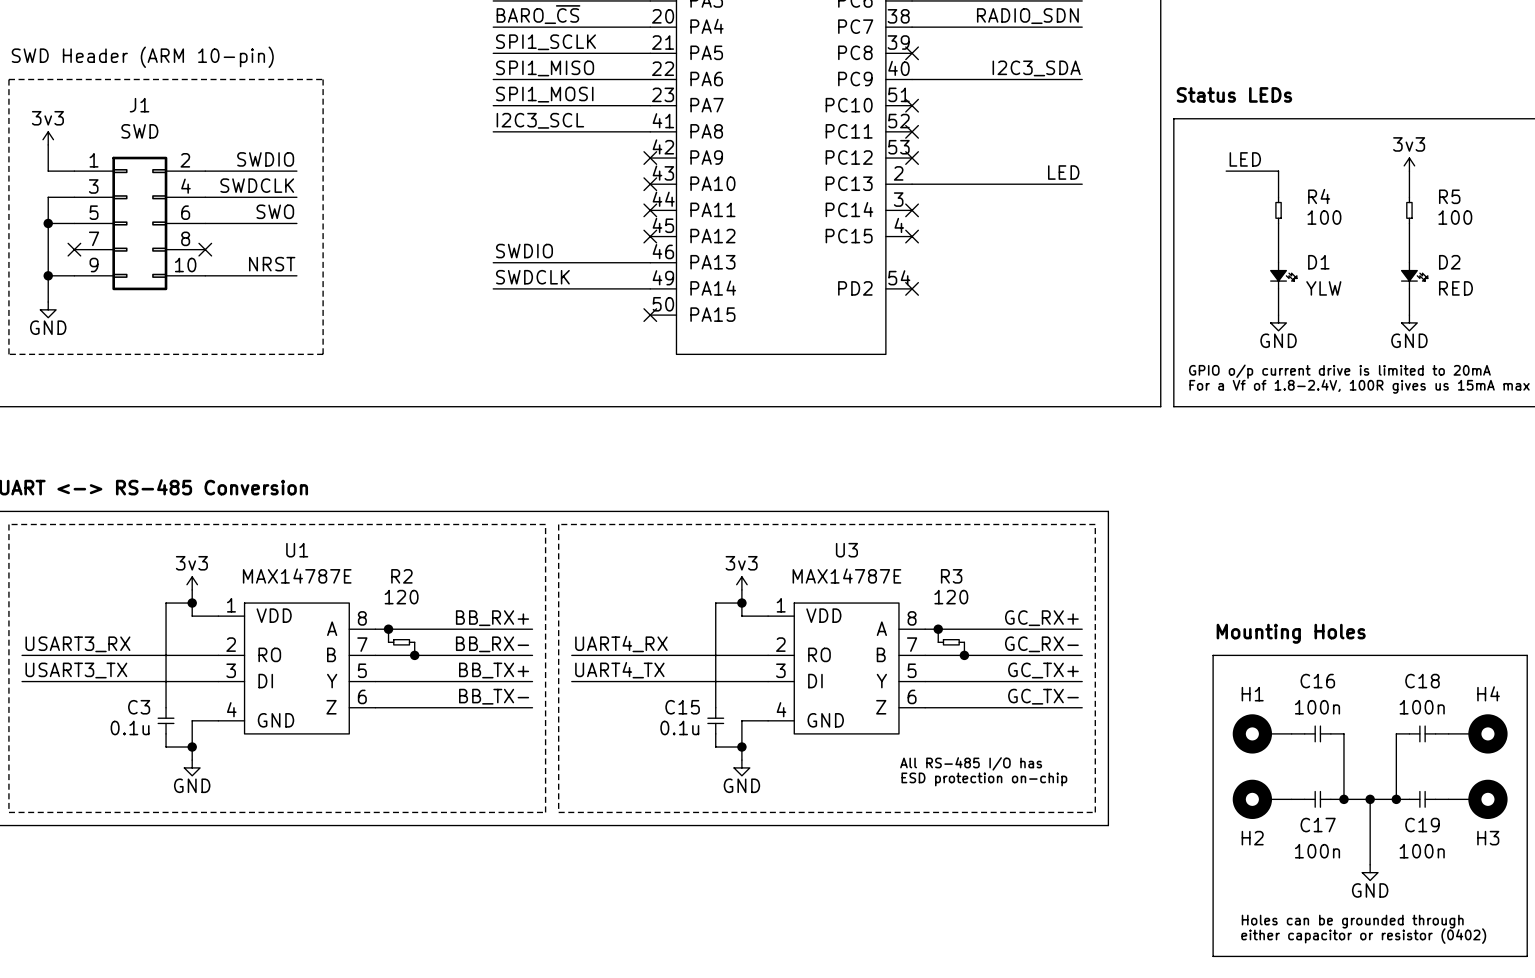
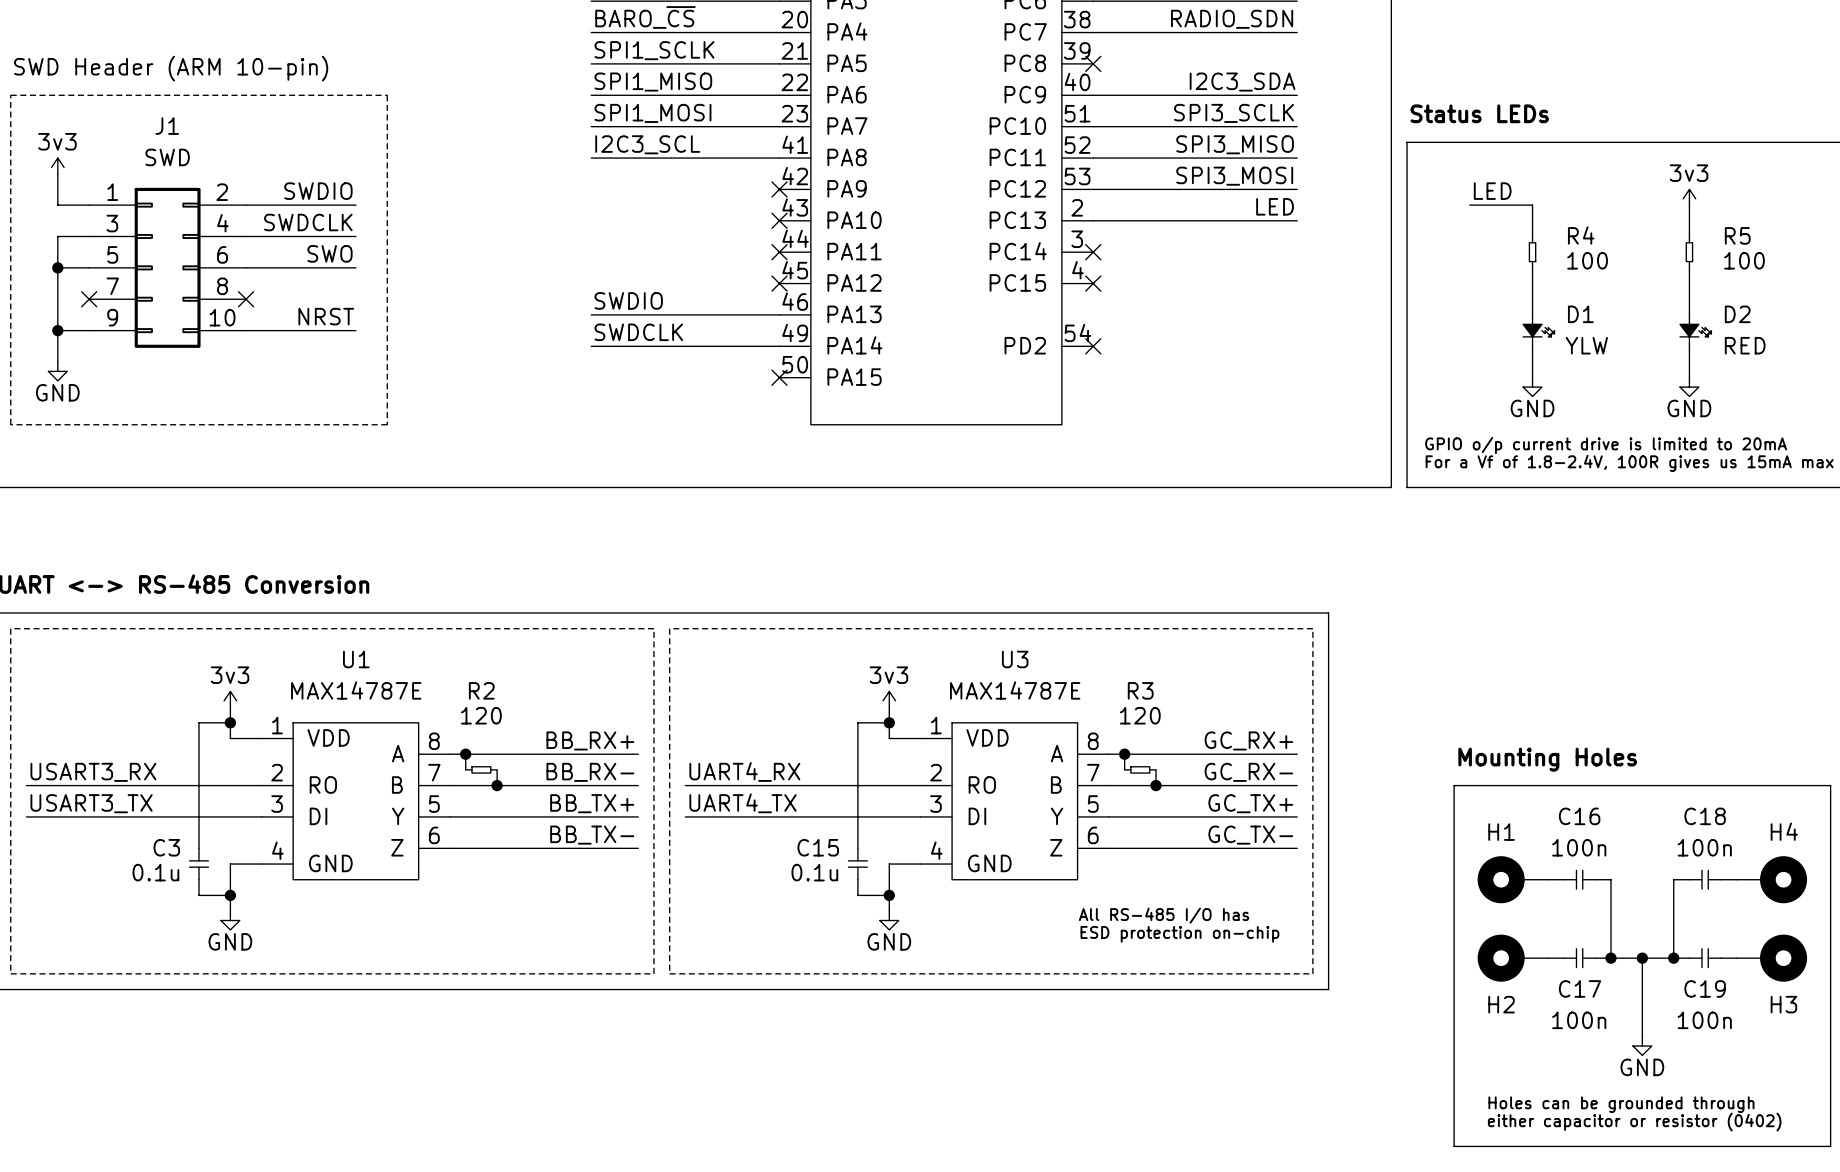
label: none -> SPI3_SCLK (1233, 113)
wire: none -> (1093, 126) (1297, 126)
no-connect mark: (912, 105) -> none
label: none -> SPI3_MISO (1235, 144)
wire: none -> (1093, 158) (1297, 158)
no-connect mark: (912, 131) -> none
label: none -> SPI3_MOSI (1234, 176)
wire: none -> (1093, 189) (1297, 189)
no-connect mark: (912, 158) -> none

